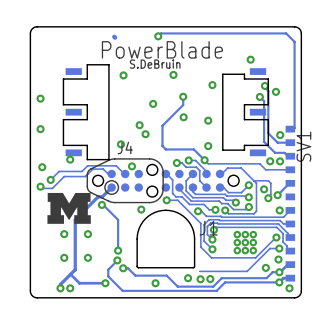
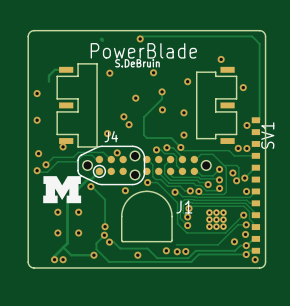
track: none -> (66, 69) (54, 69) (48, 75) (48, 81)
track: (264, 85) (268, 91) (268, 133) (277, 142) (290, 142) -> none
via: (264, 85) -> none
track: (259, 96) (264, 101) (264, 141) (275, 152) (284, 152) (287, 156) -> none
via: (259, 96) -> none

